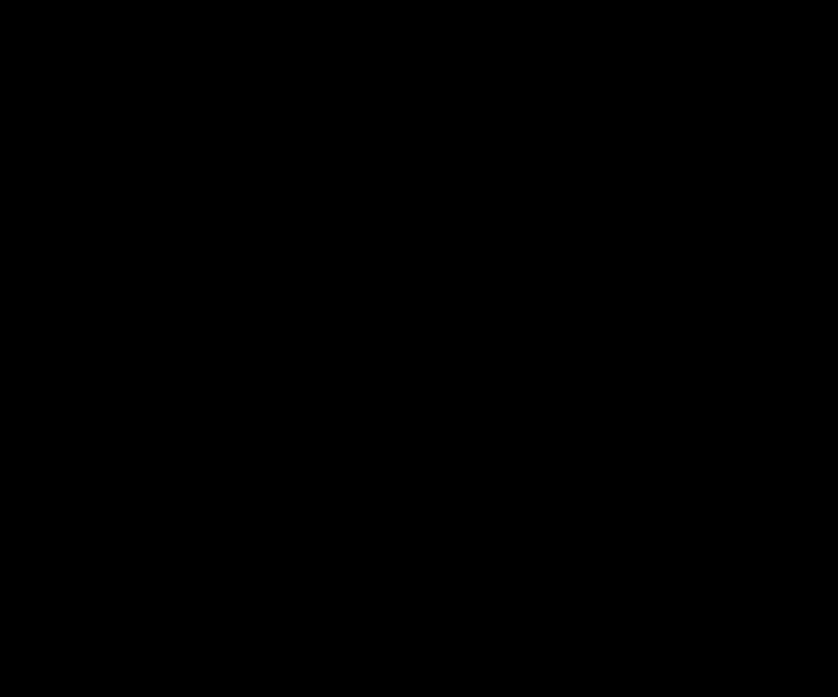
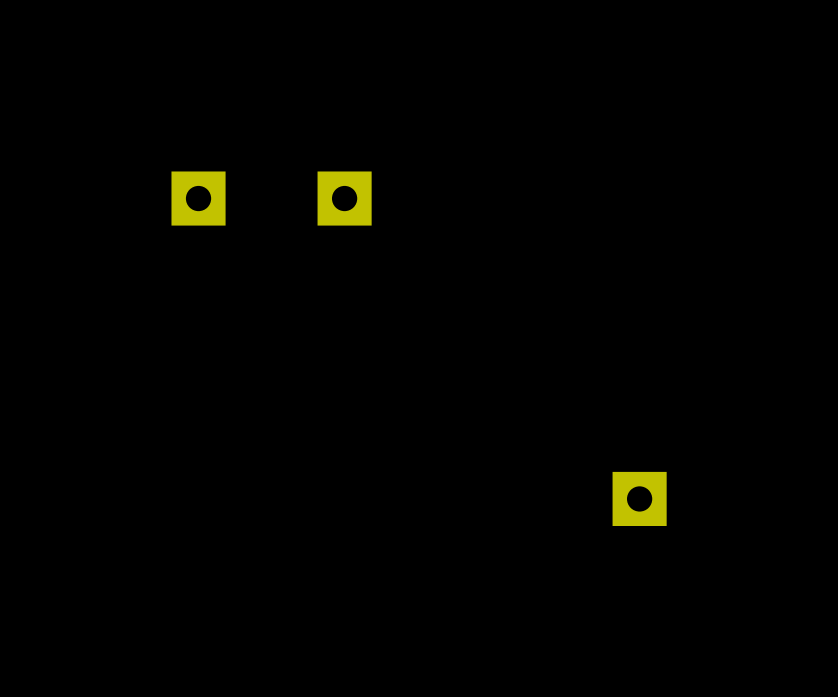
part: none -> (198, 198)
part: none -> (344, 198)
part: none -> (639, 498)

